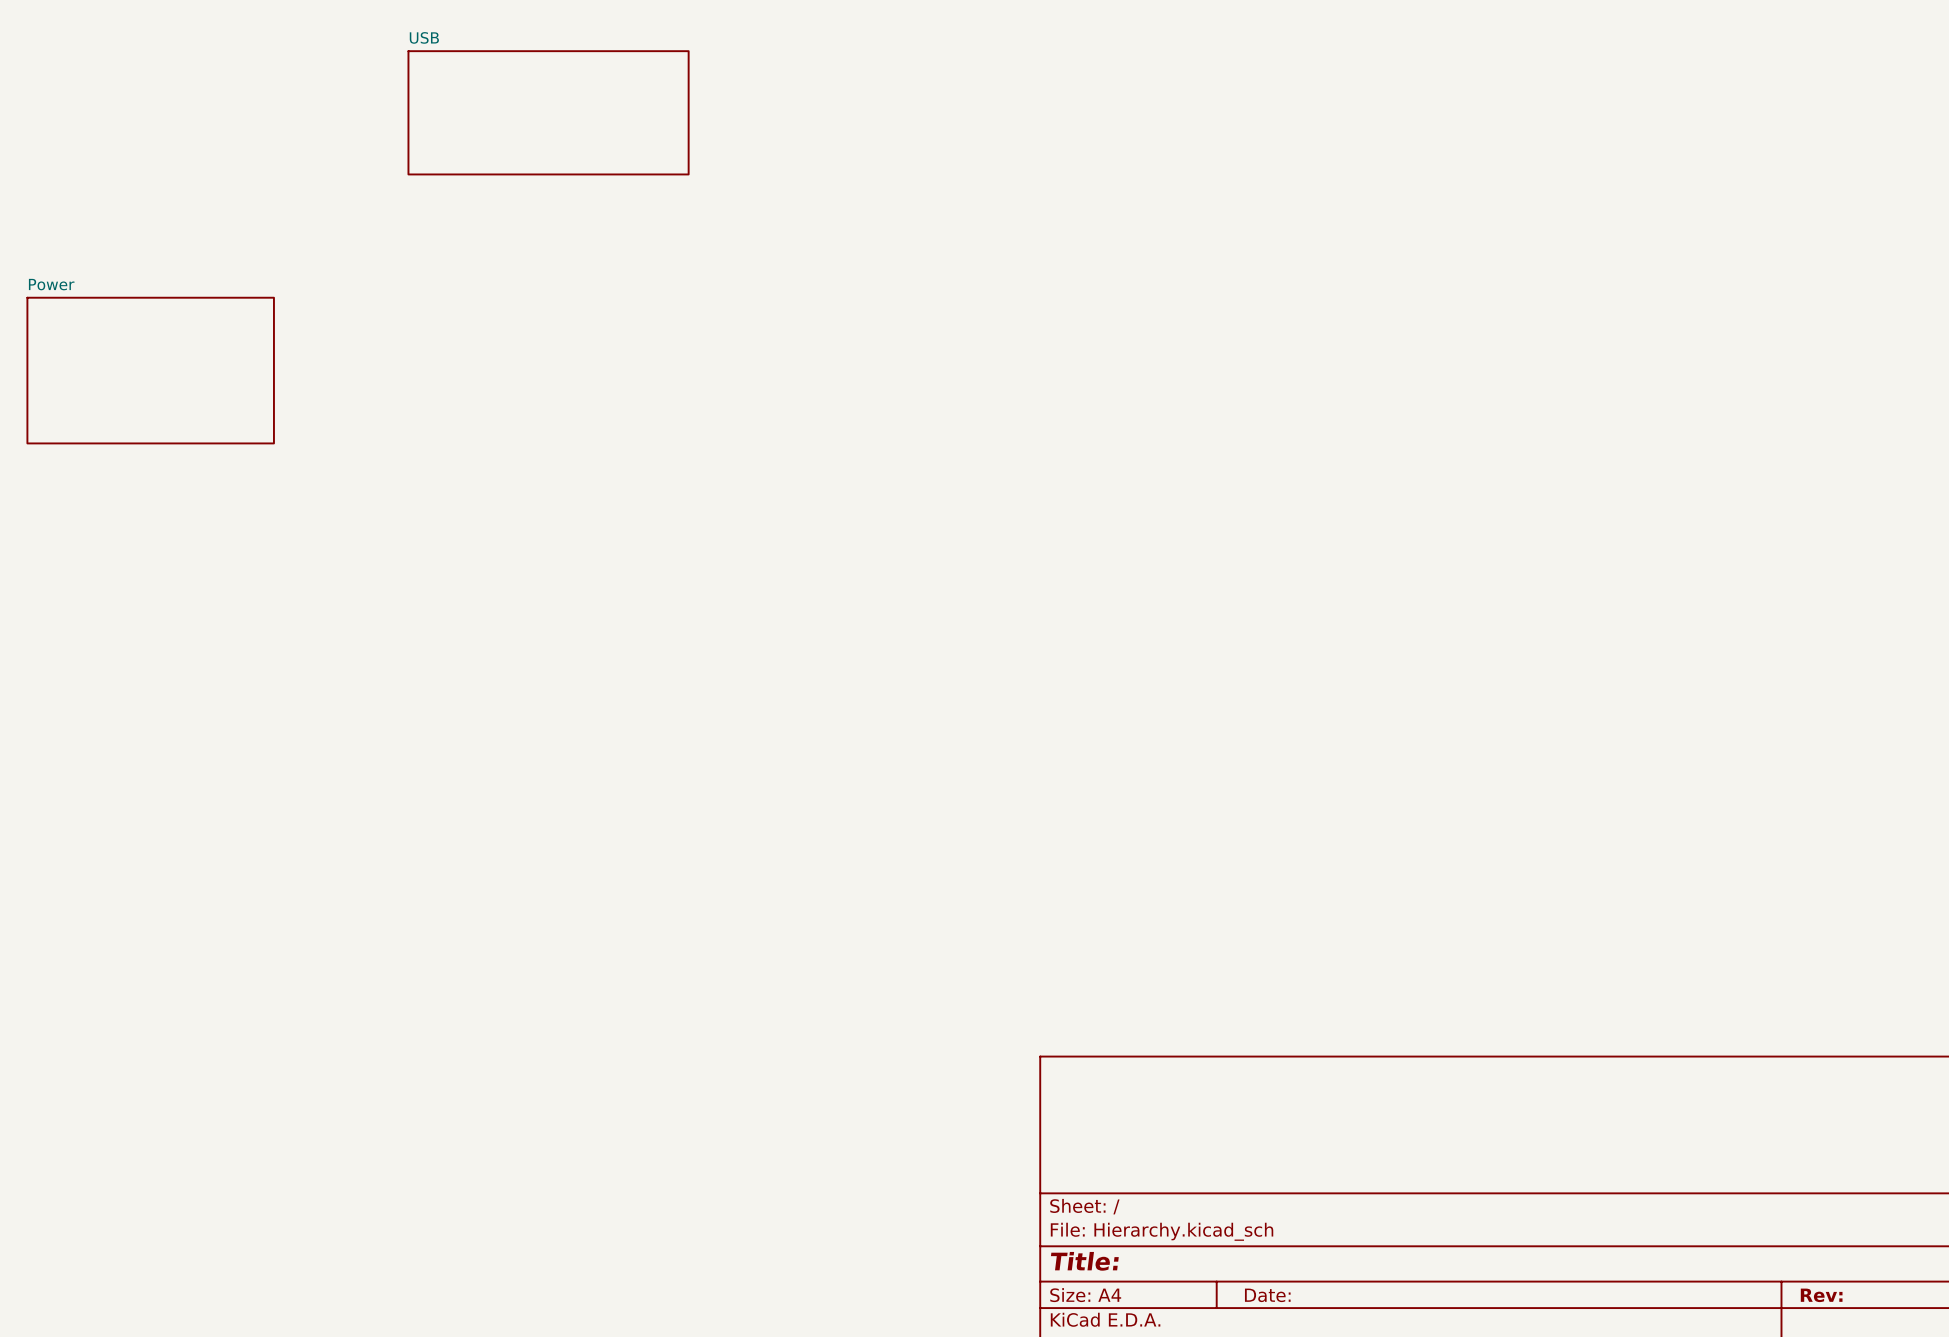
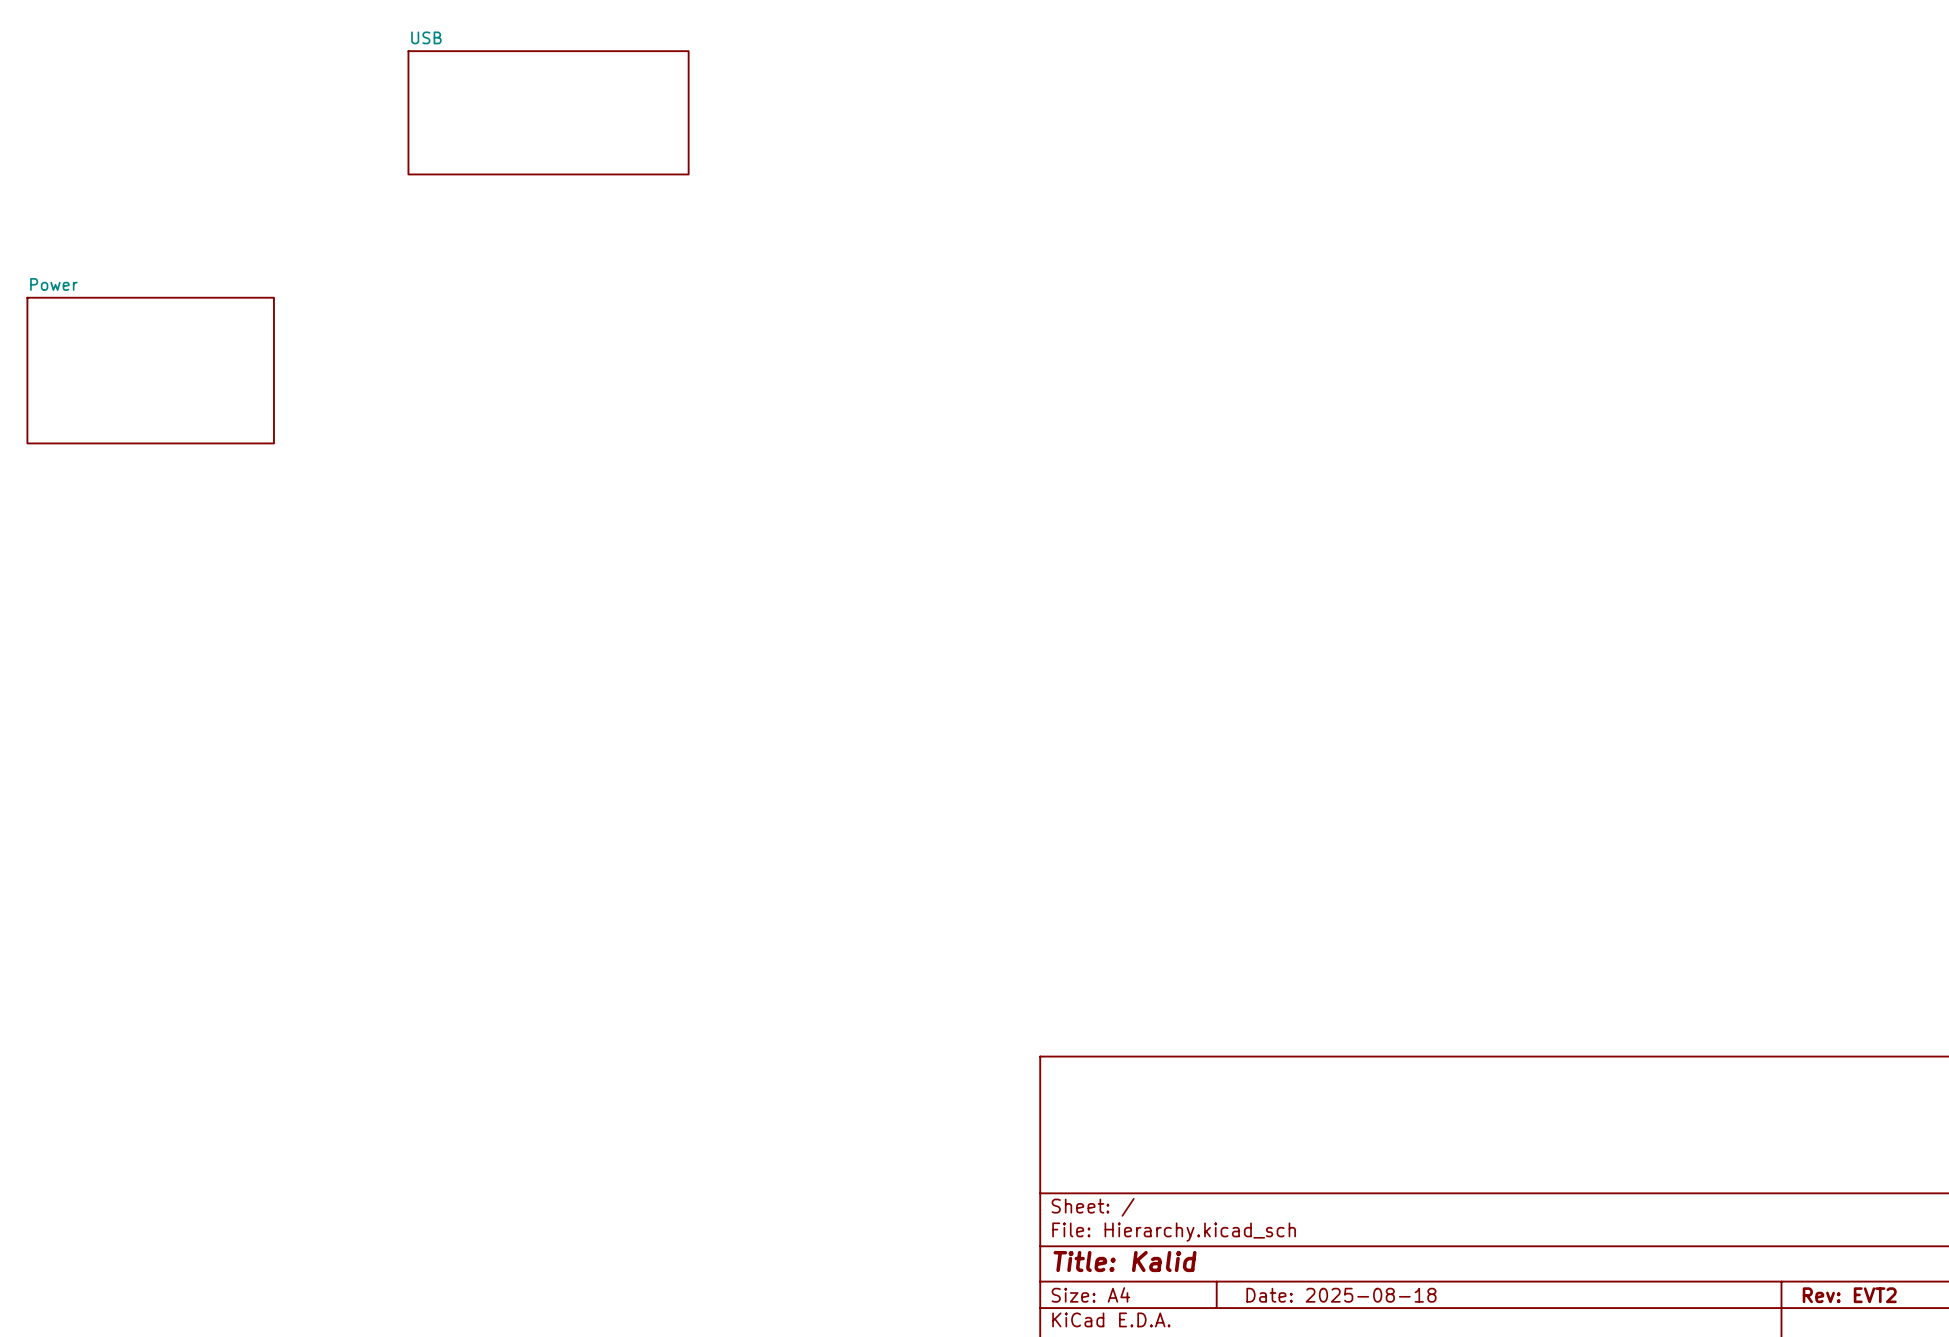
title block: Title: (1084, 1261) -> Title: Kalid (1125, 1261)
title block: Date: (1267, 1295) -> Date: 2025-08-18 (1341, 1295)
title block: Rev: (1821, 1295) -> Rev: EVT2 (1849, 1295)

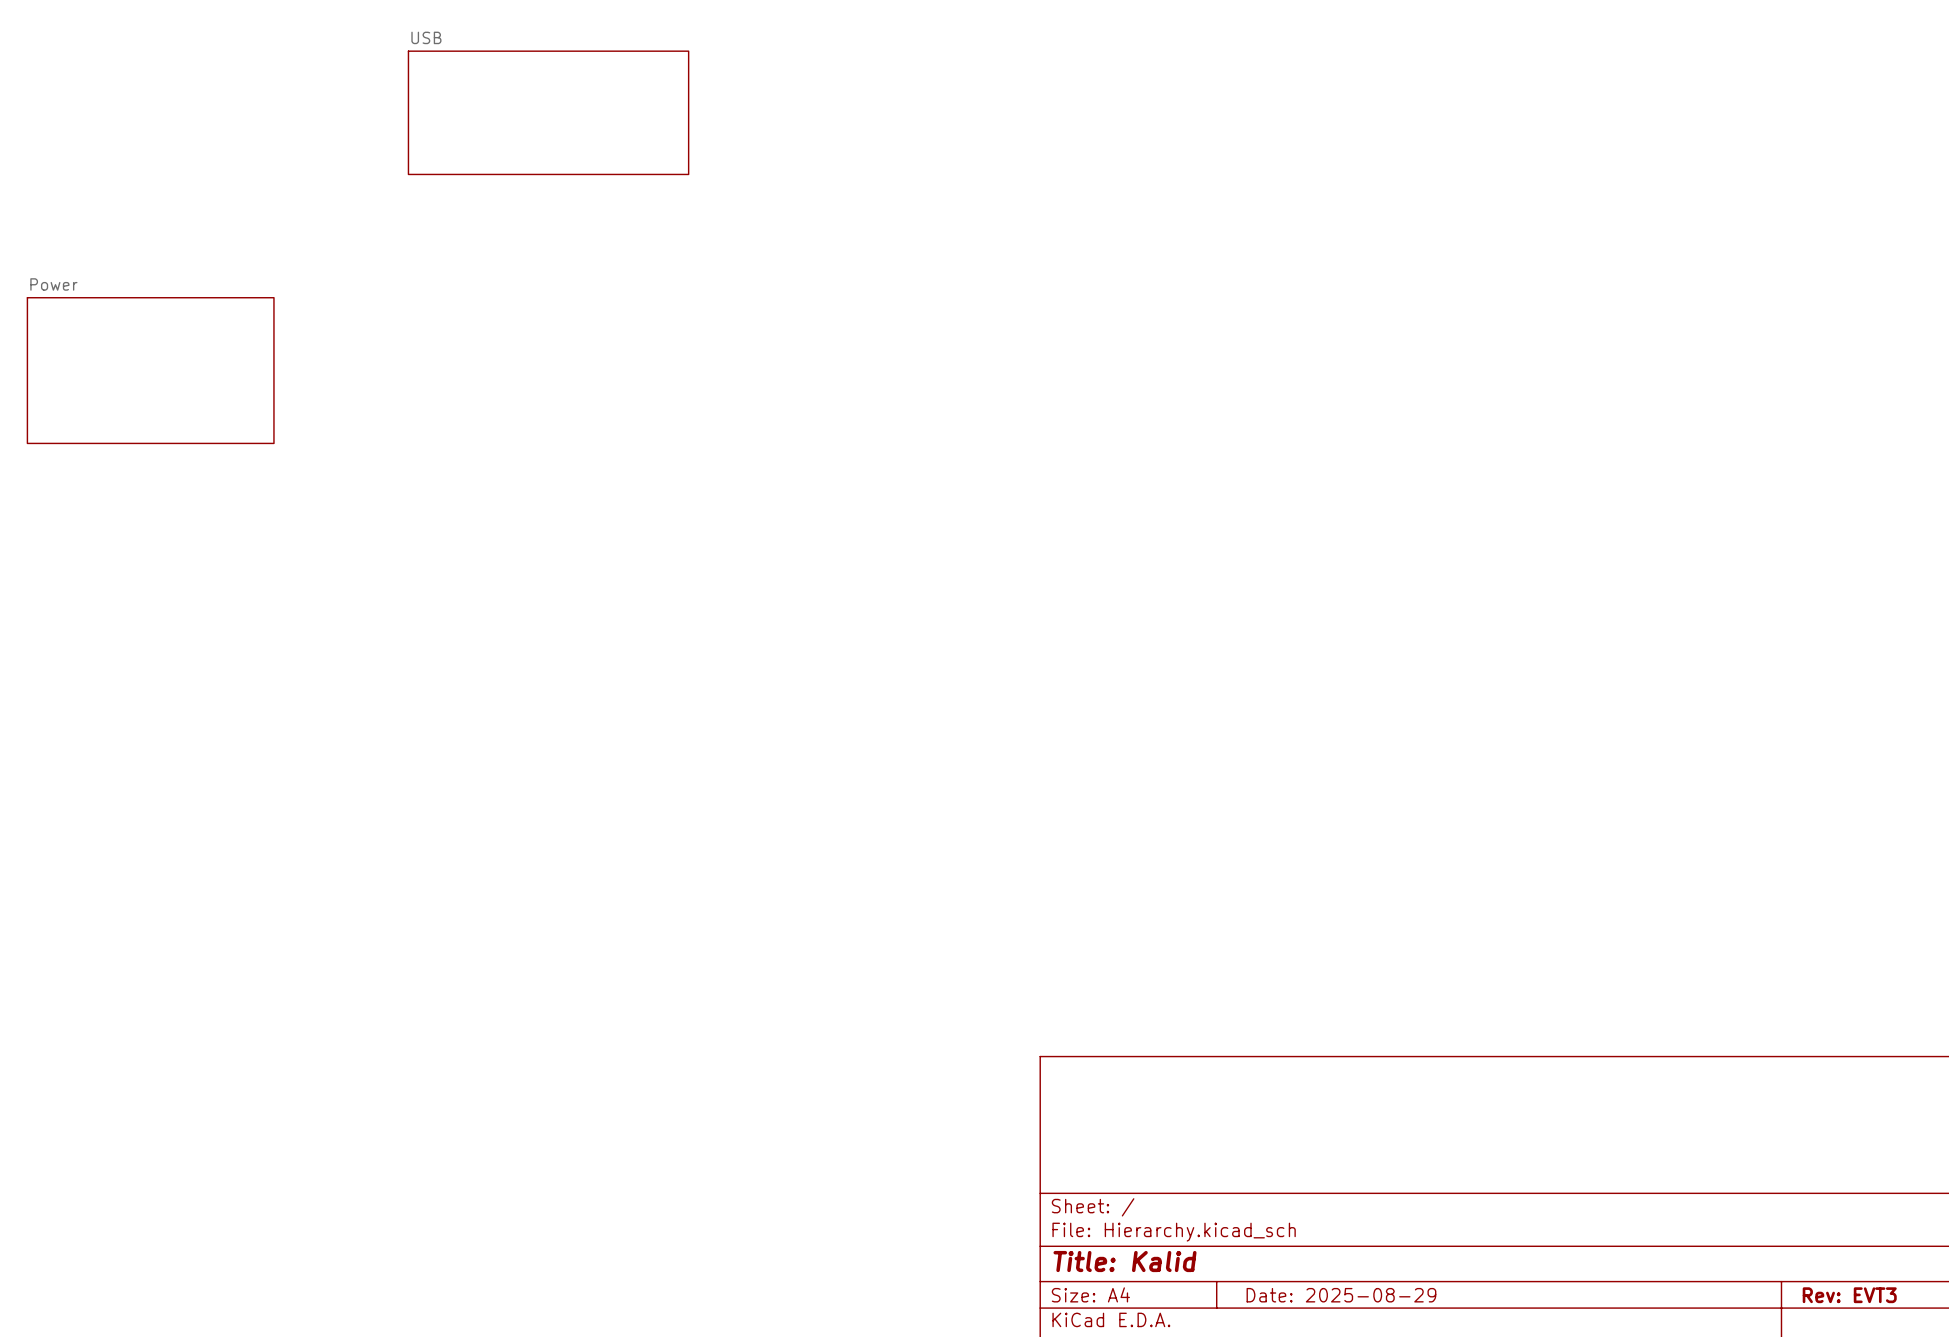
title block: Date: 2025-08-18 (1341, 1295) -> Date: 2025-08-29 (1341, 1295)
title block: Rev: EVT2 (1849, 1295) -> Rev: EVT3 (1849, 1295)

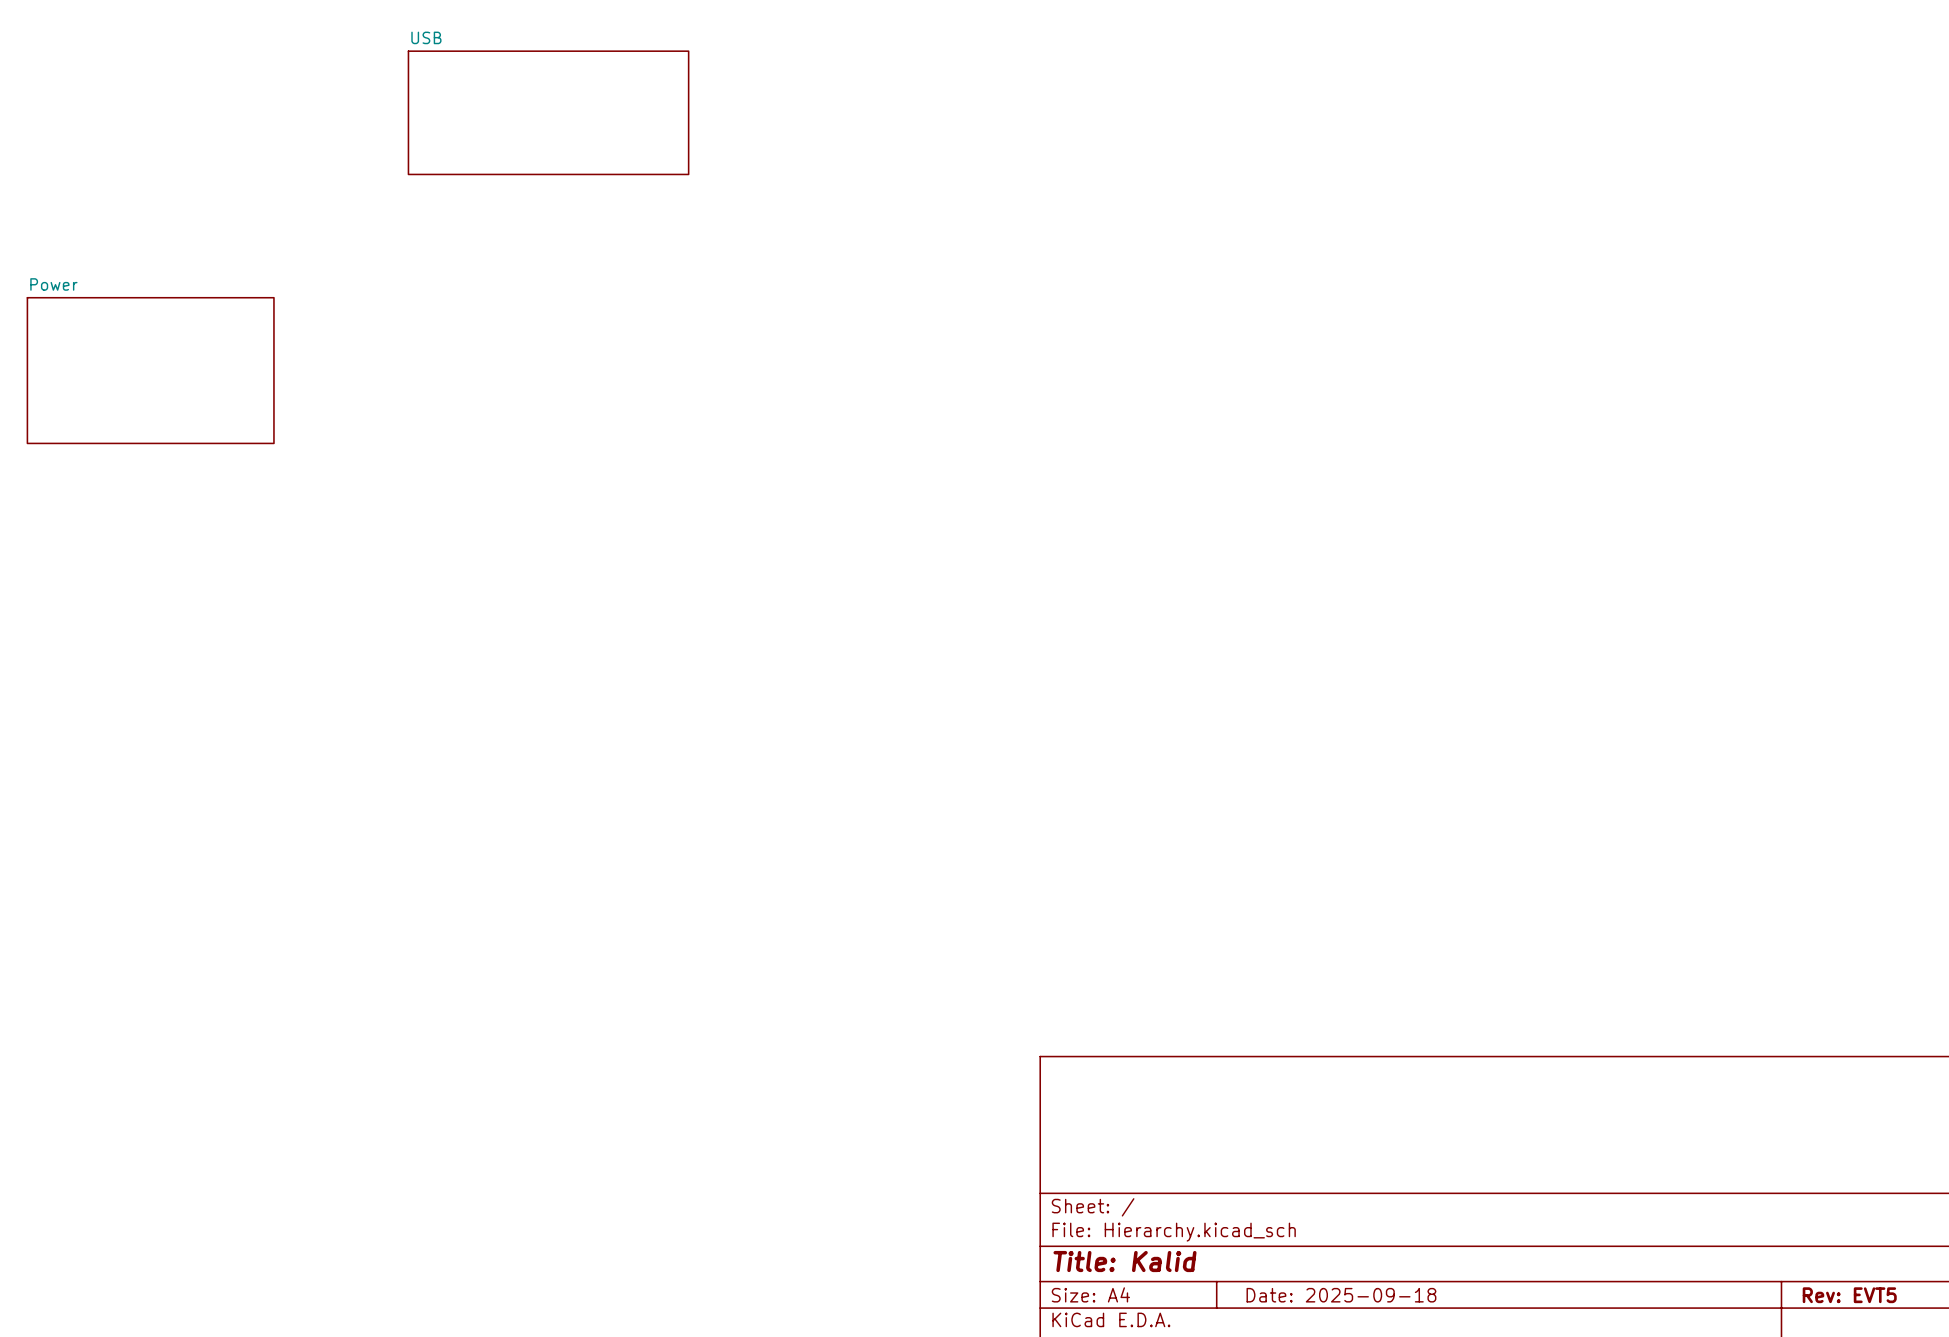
title block: Date: 2025-08-29 (1341, 1295) -> Date: 2025-09-18 (1341, 1295)
title block: Rev: EVT3 (1849, 1295) -> Rev: EVT5 (1849, 1295)

